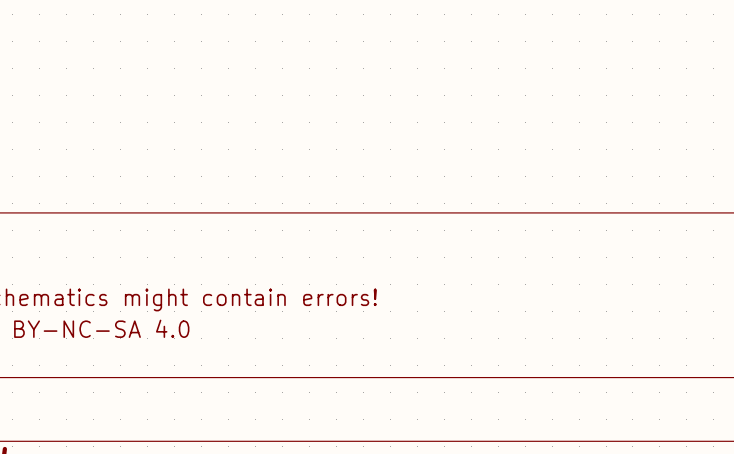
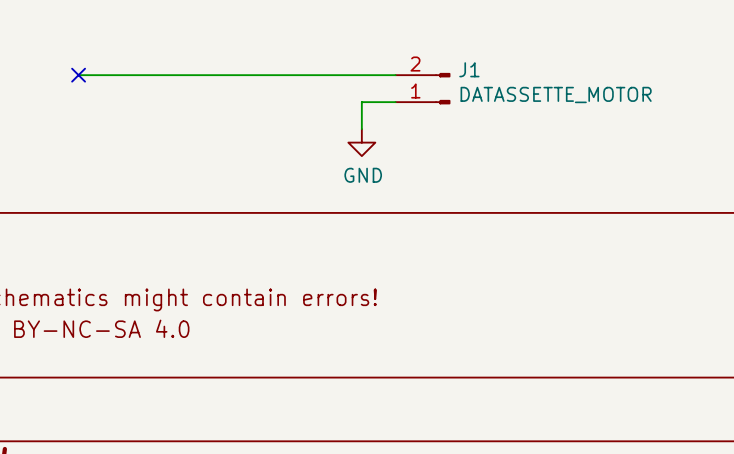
wire: none -> (78, 75) (395, 75)
no-connect mark: none -> (78, 75)
J1: none -> DATASSETTE_MOTOR (422, 88)
wire: none -> (395, 102) (361, 102) (361, 129)
power symbol: none -> GND (361, 142)

